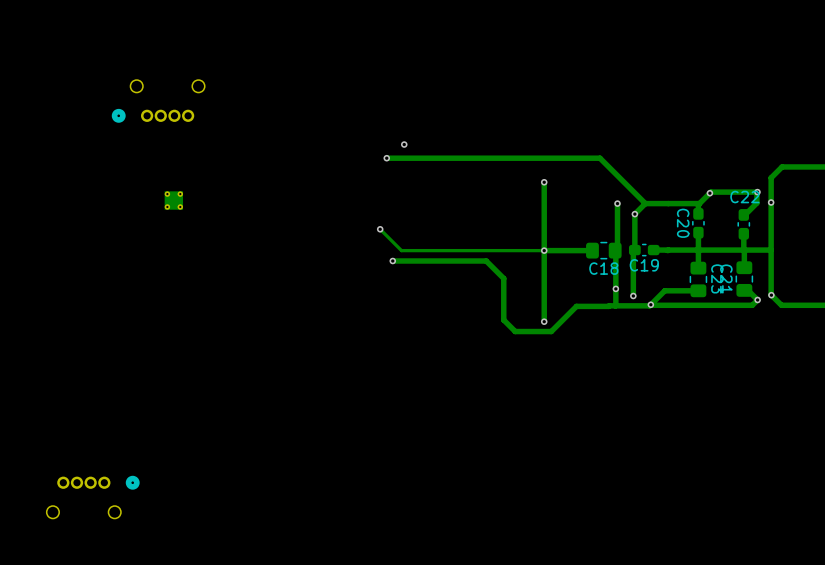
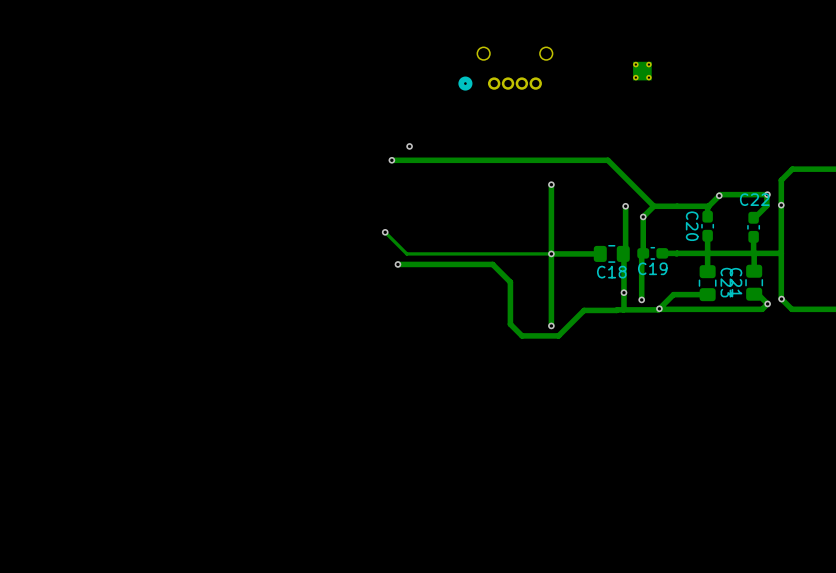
part: none -> (505, 68)
part: none -> (642, 71)
part: (158, 101) -> none
part: (173, 200) -> none
part: (93, 497) -> none

